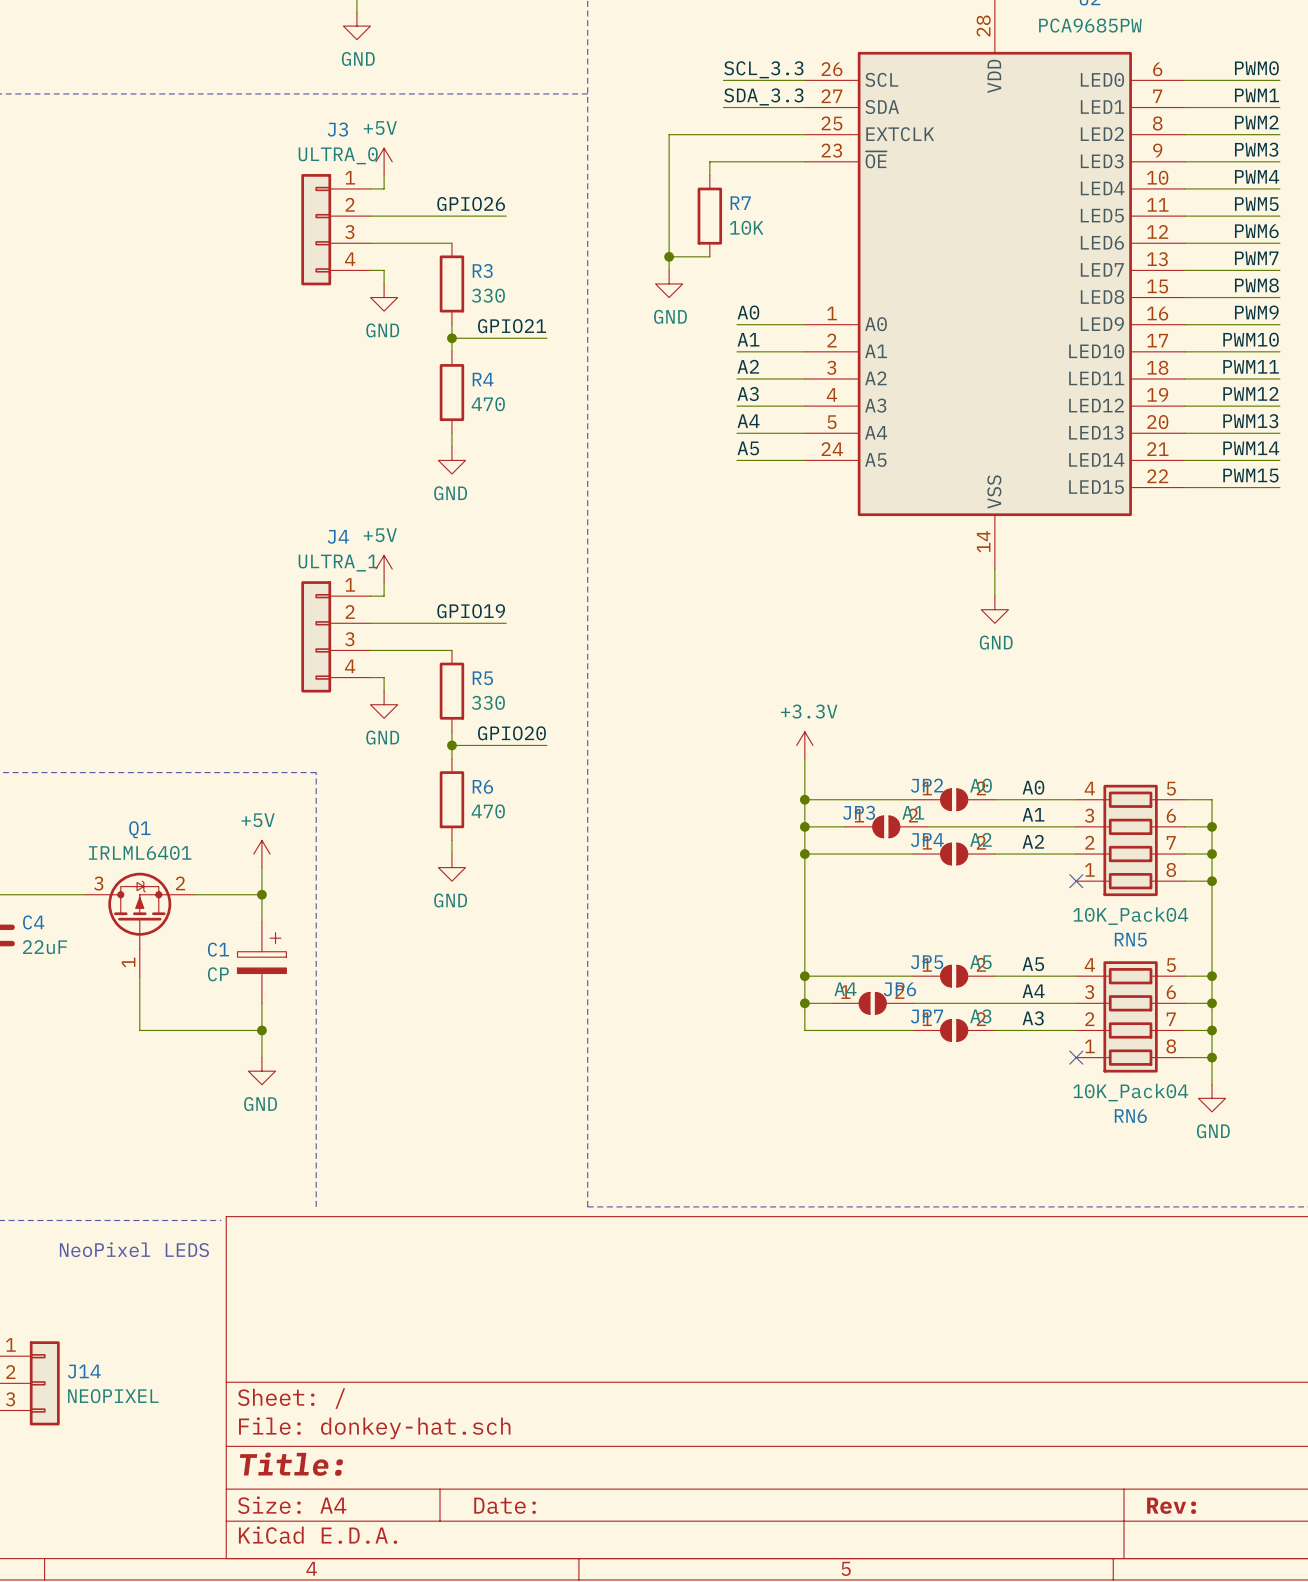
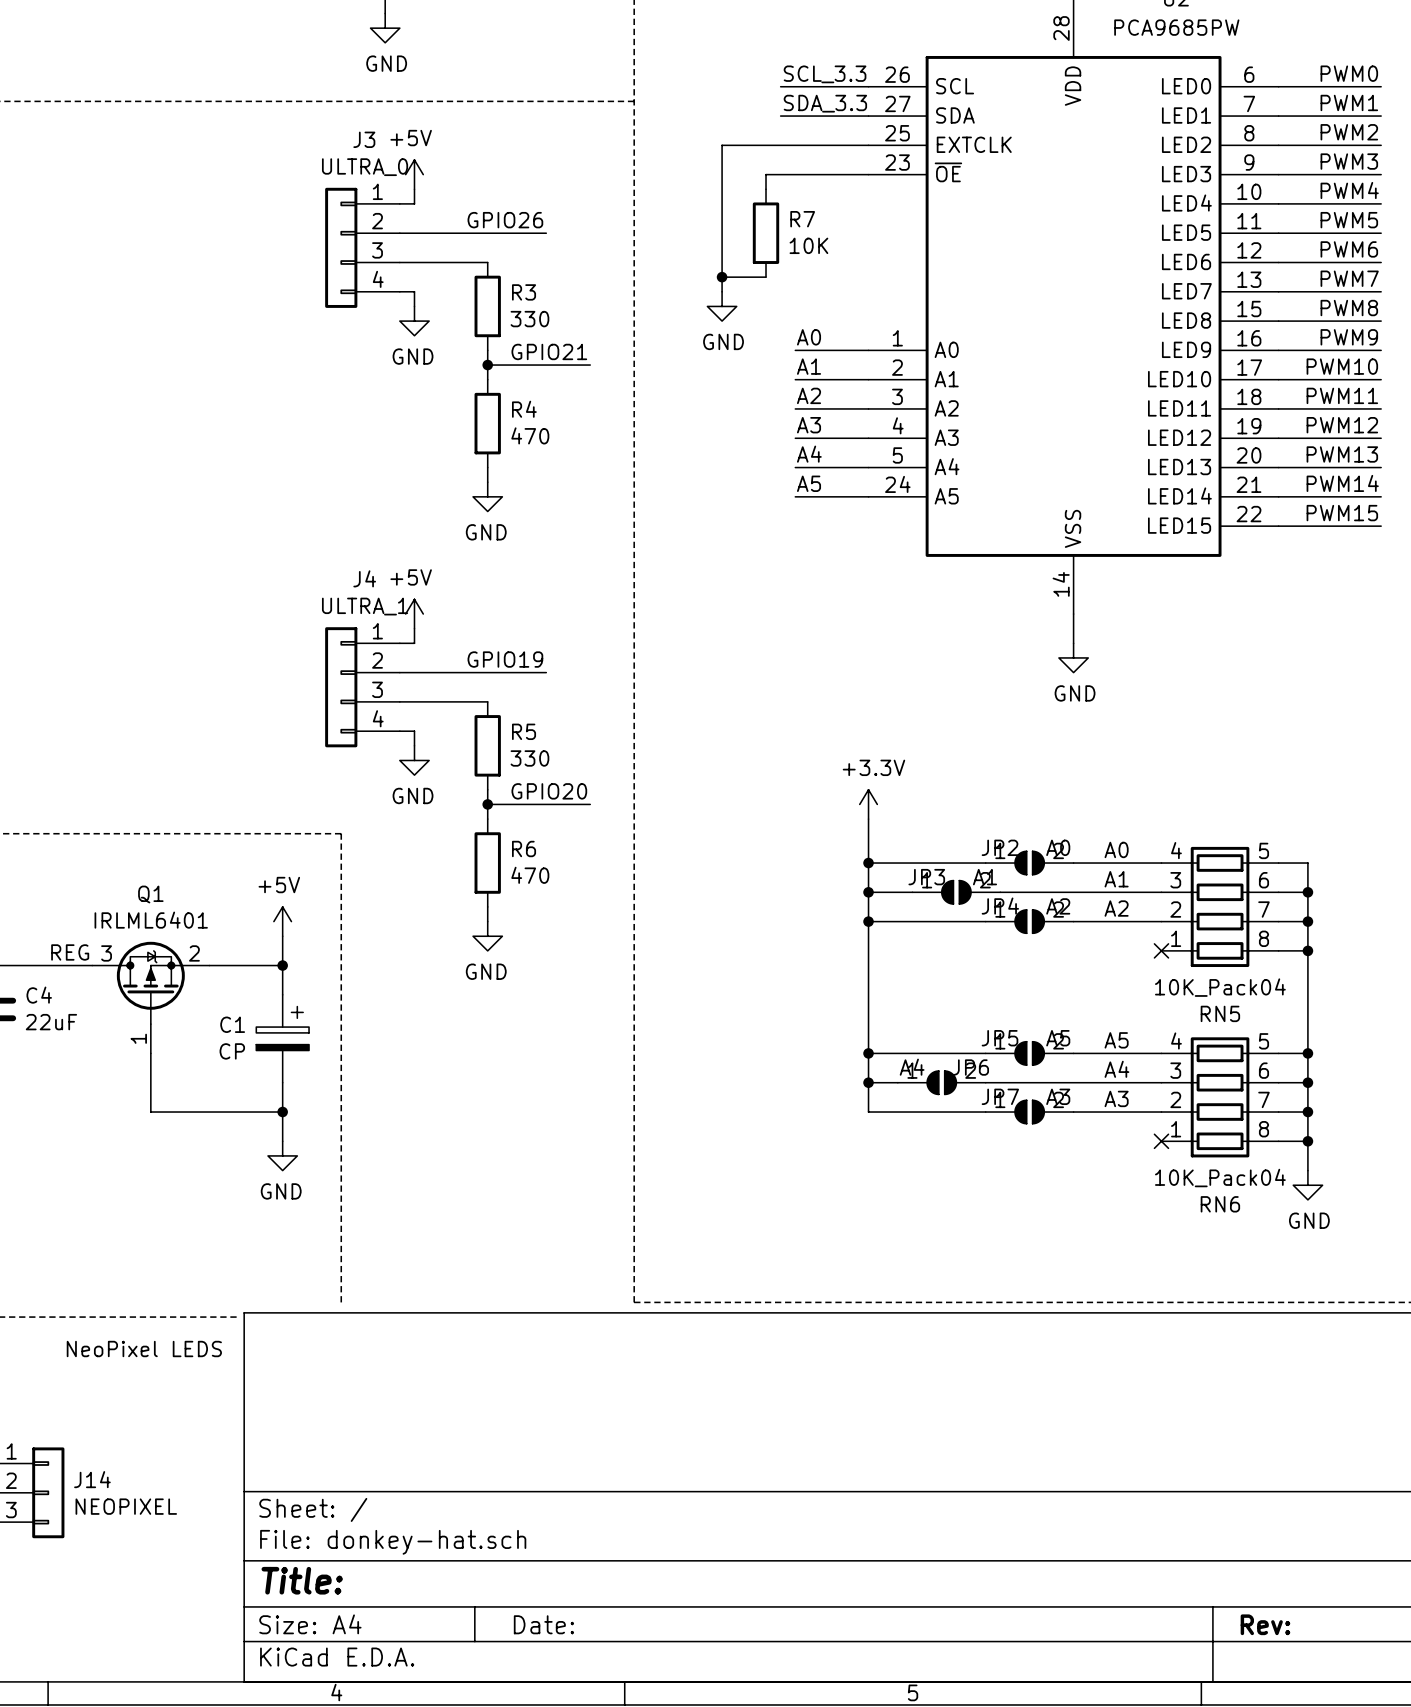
label: none -> REG (70, 952)

